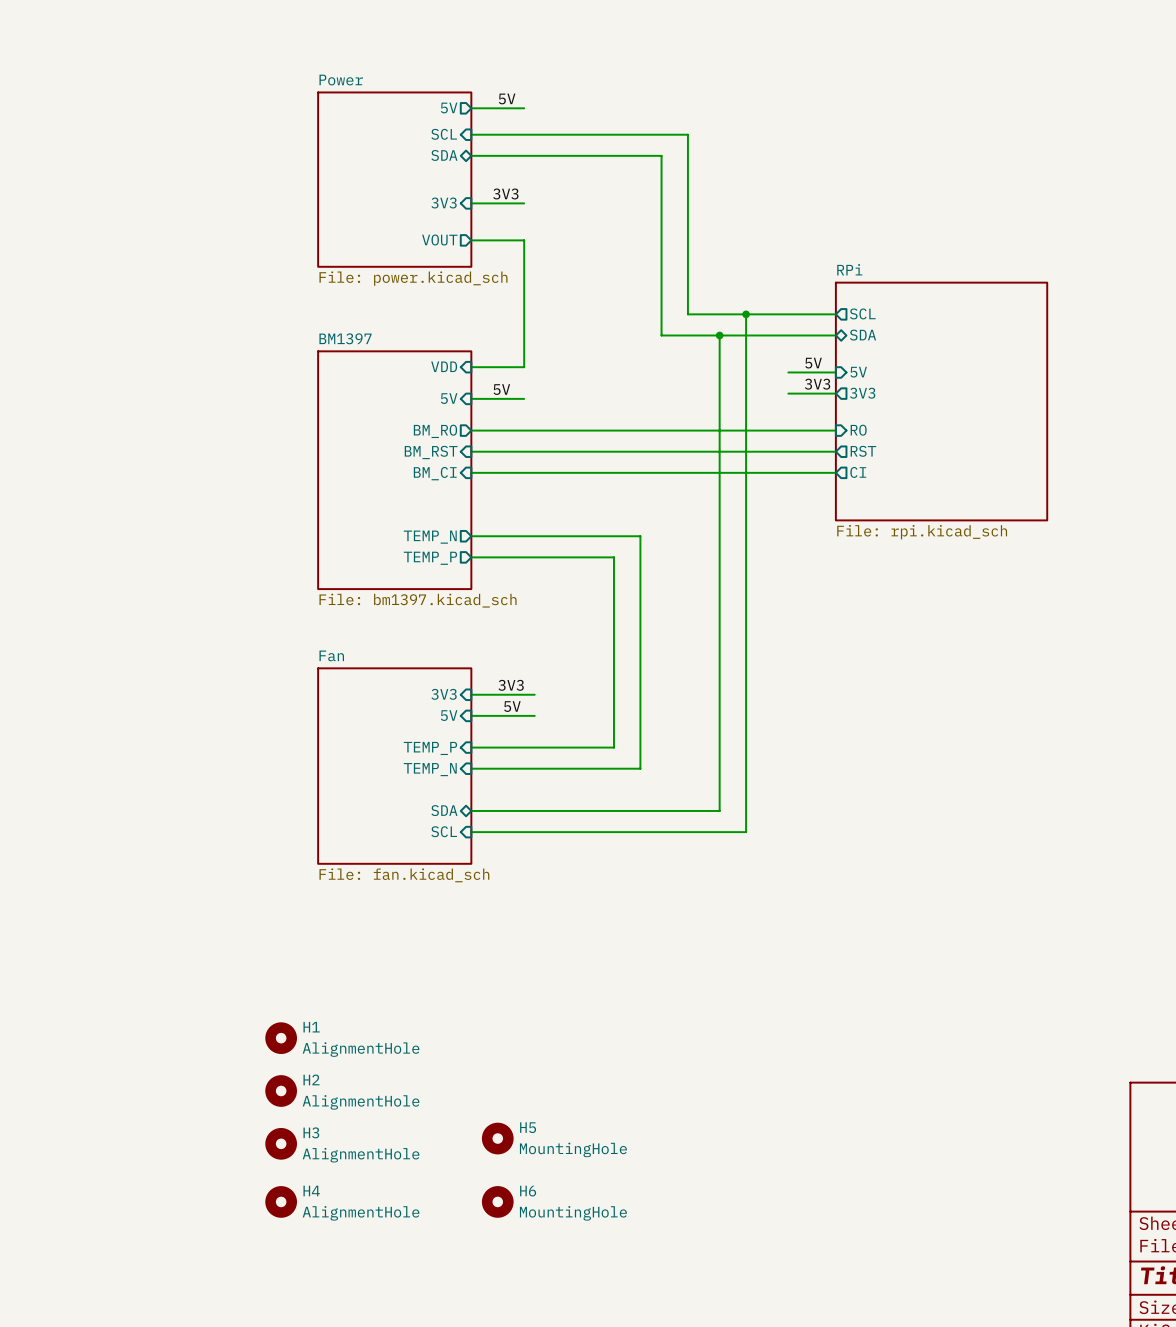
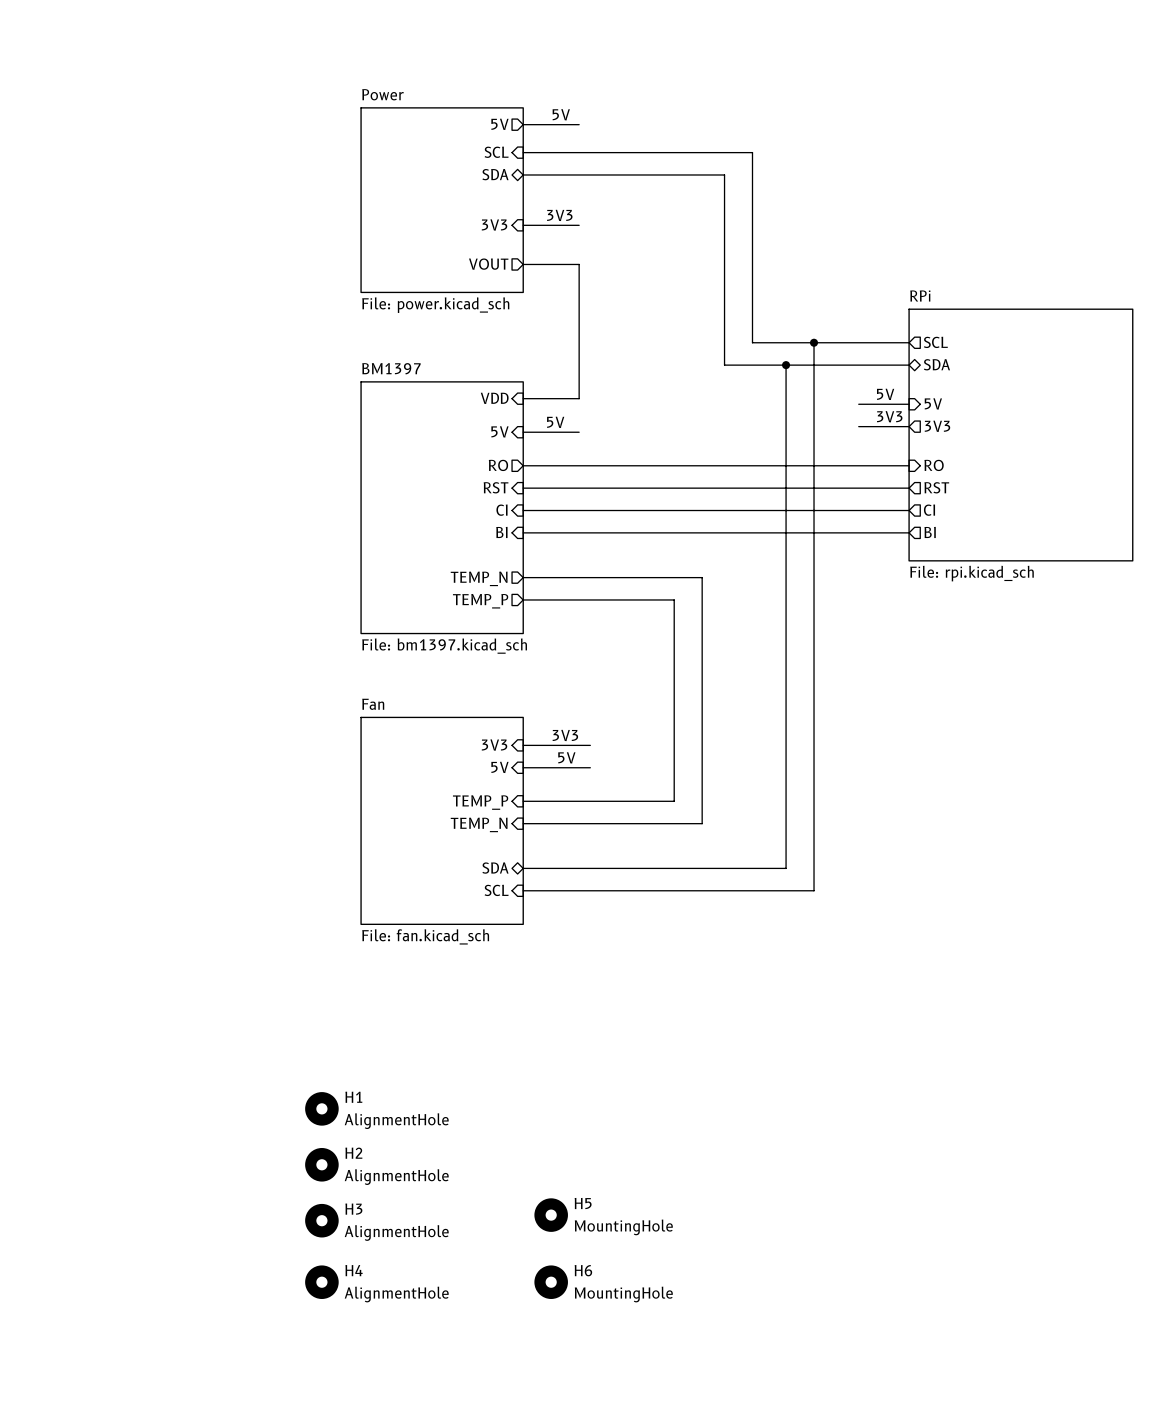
sheet pin: BM_RO (435, 431) -> RO (498, 465)
sheet pin: BM_RST (431, 452) -> RST (496, 487)
sheet pin: BM_CI (435, 473) -> CI (501, 510)
sheet pin: none -> BI (501, 532)
wire: none -> (523, 532) (909, 532)
sheet pin: none -> BI (930, 532)

